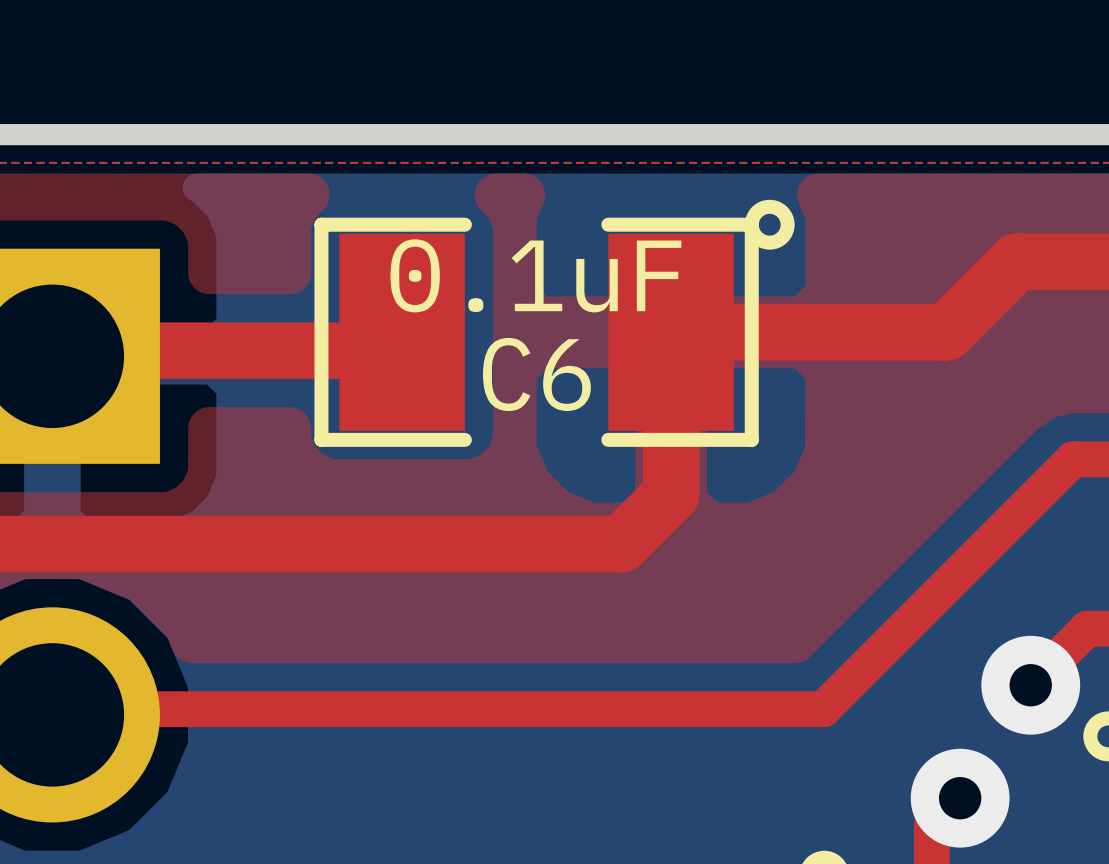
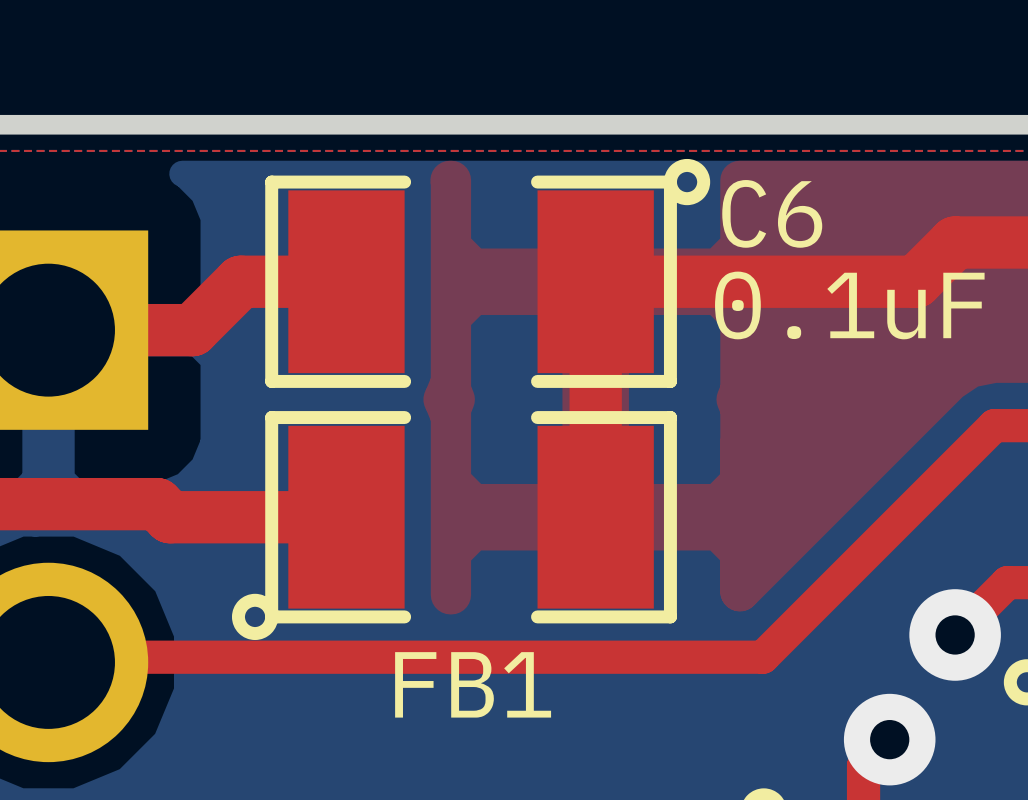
top track: (1030, 261) (1016, 261) (946, 332) (671, 332) (671, 494) (621, 544) (169, 544) -> (955, 242) (915, 281) (595, 281) (595, 517)
C6 value position: 0.1uF (535, 275) -> 0.1uF (849, 305)
C6 position: (554, 323) -> (487, 273)
top track: (402, 332) (383, 350) (52, 350) -> (346, 281) (240, 281) (192, 330) (48, 330)
C6 name position: C6 (536, 374) -> C6 (772, 213)
top track: none -> (157, 504) (170, 517) (346, 517)
FB1: none -> (454, 525)

